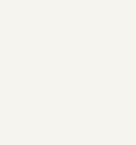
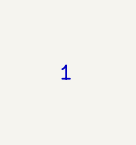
text: none -> 1 (66, 72)

